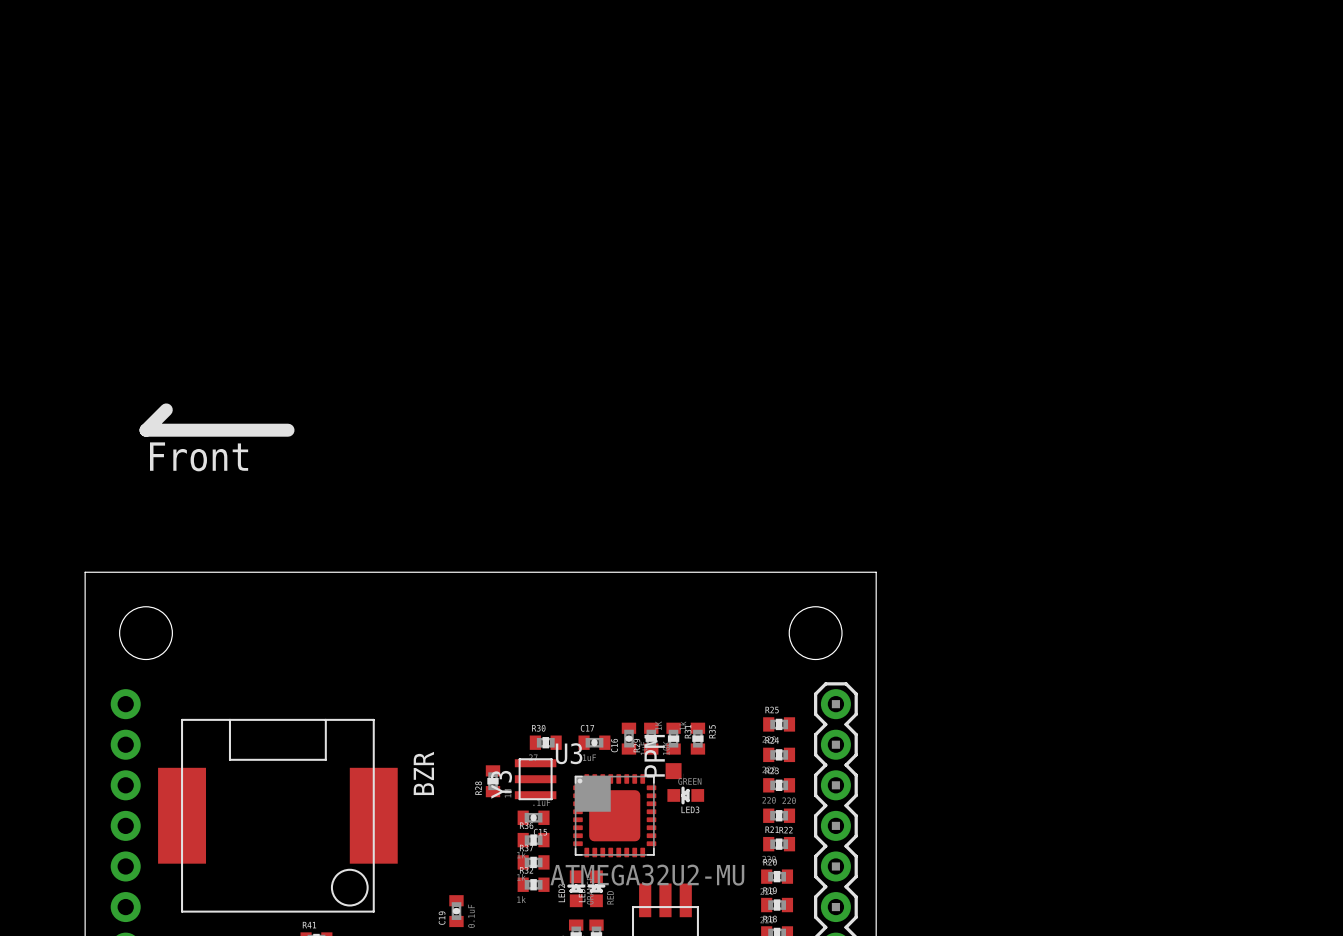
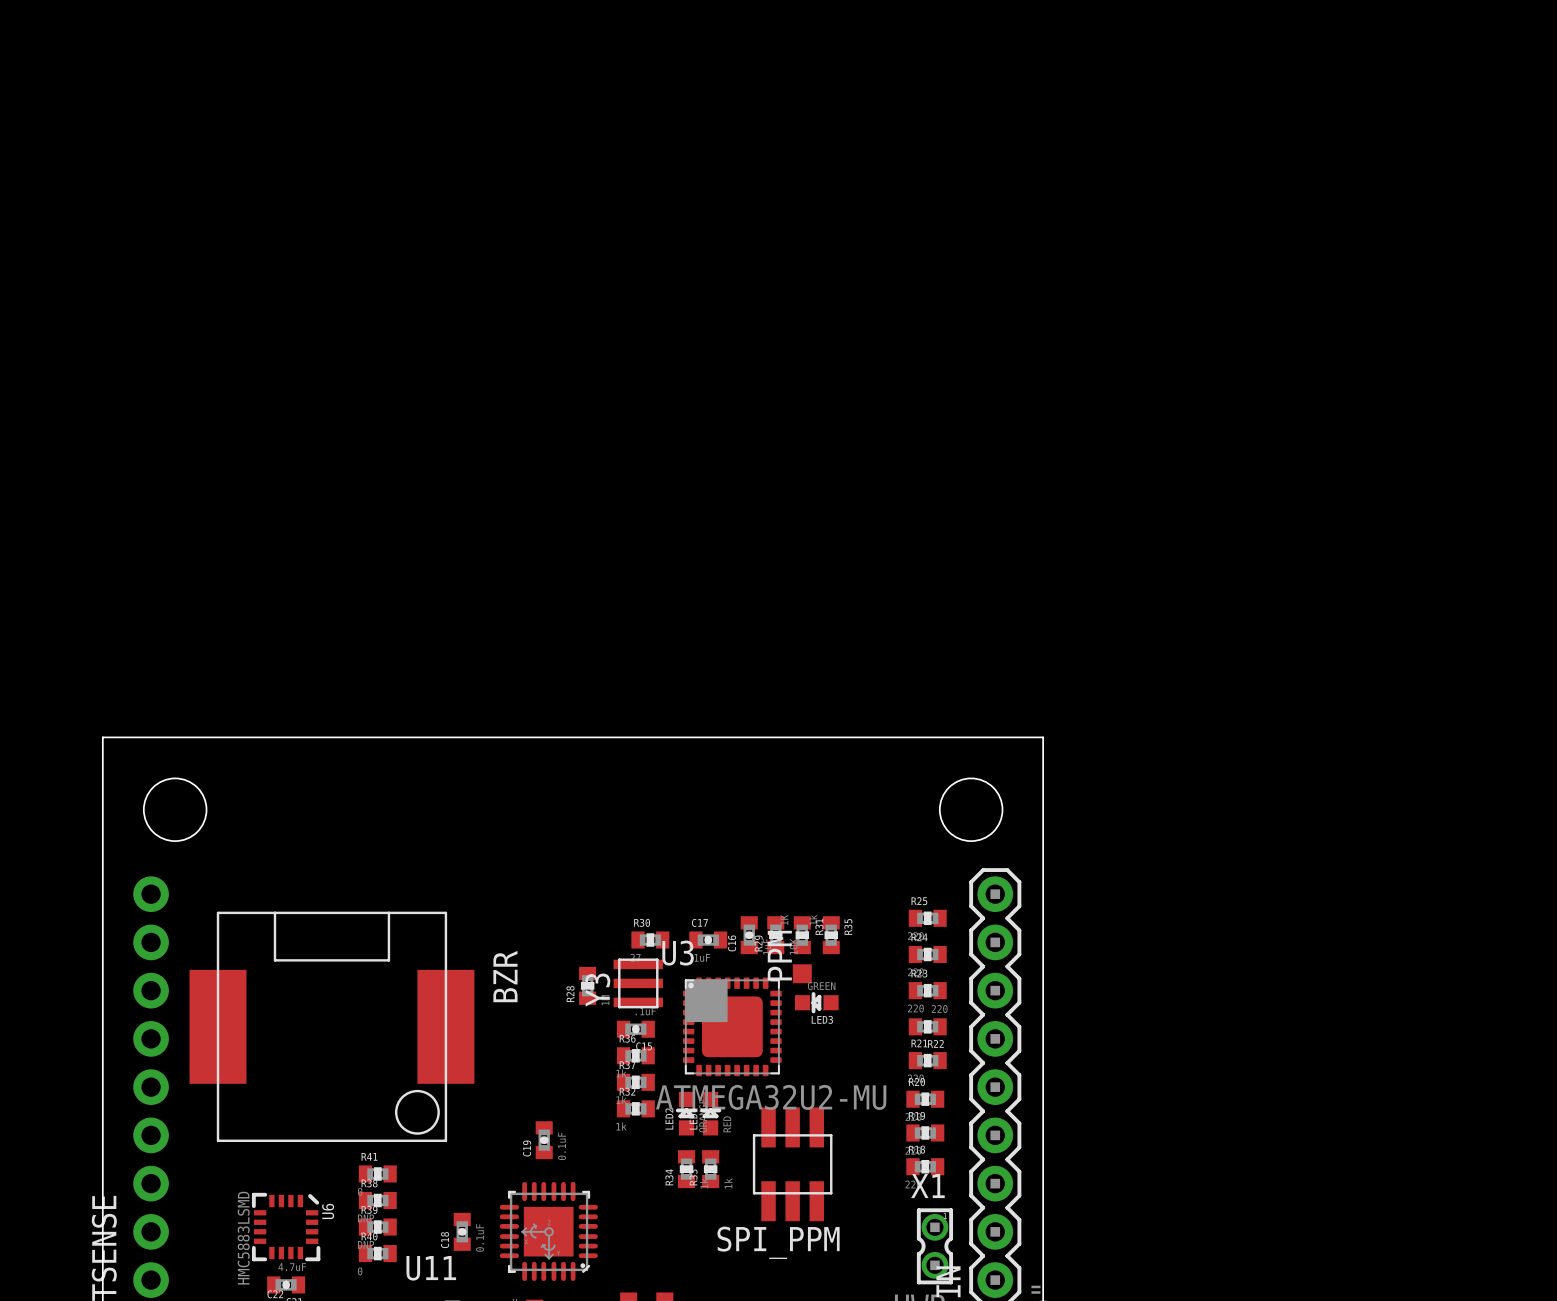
line: (166, 409) (146, 430) (288, 430) -> none
text: Front (199, 456) -> none

